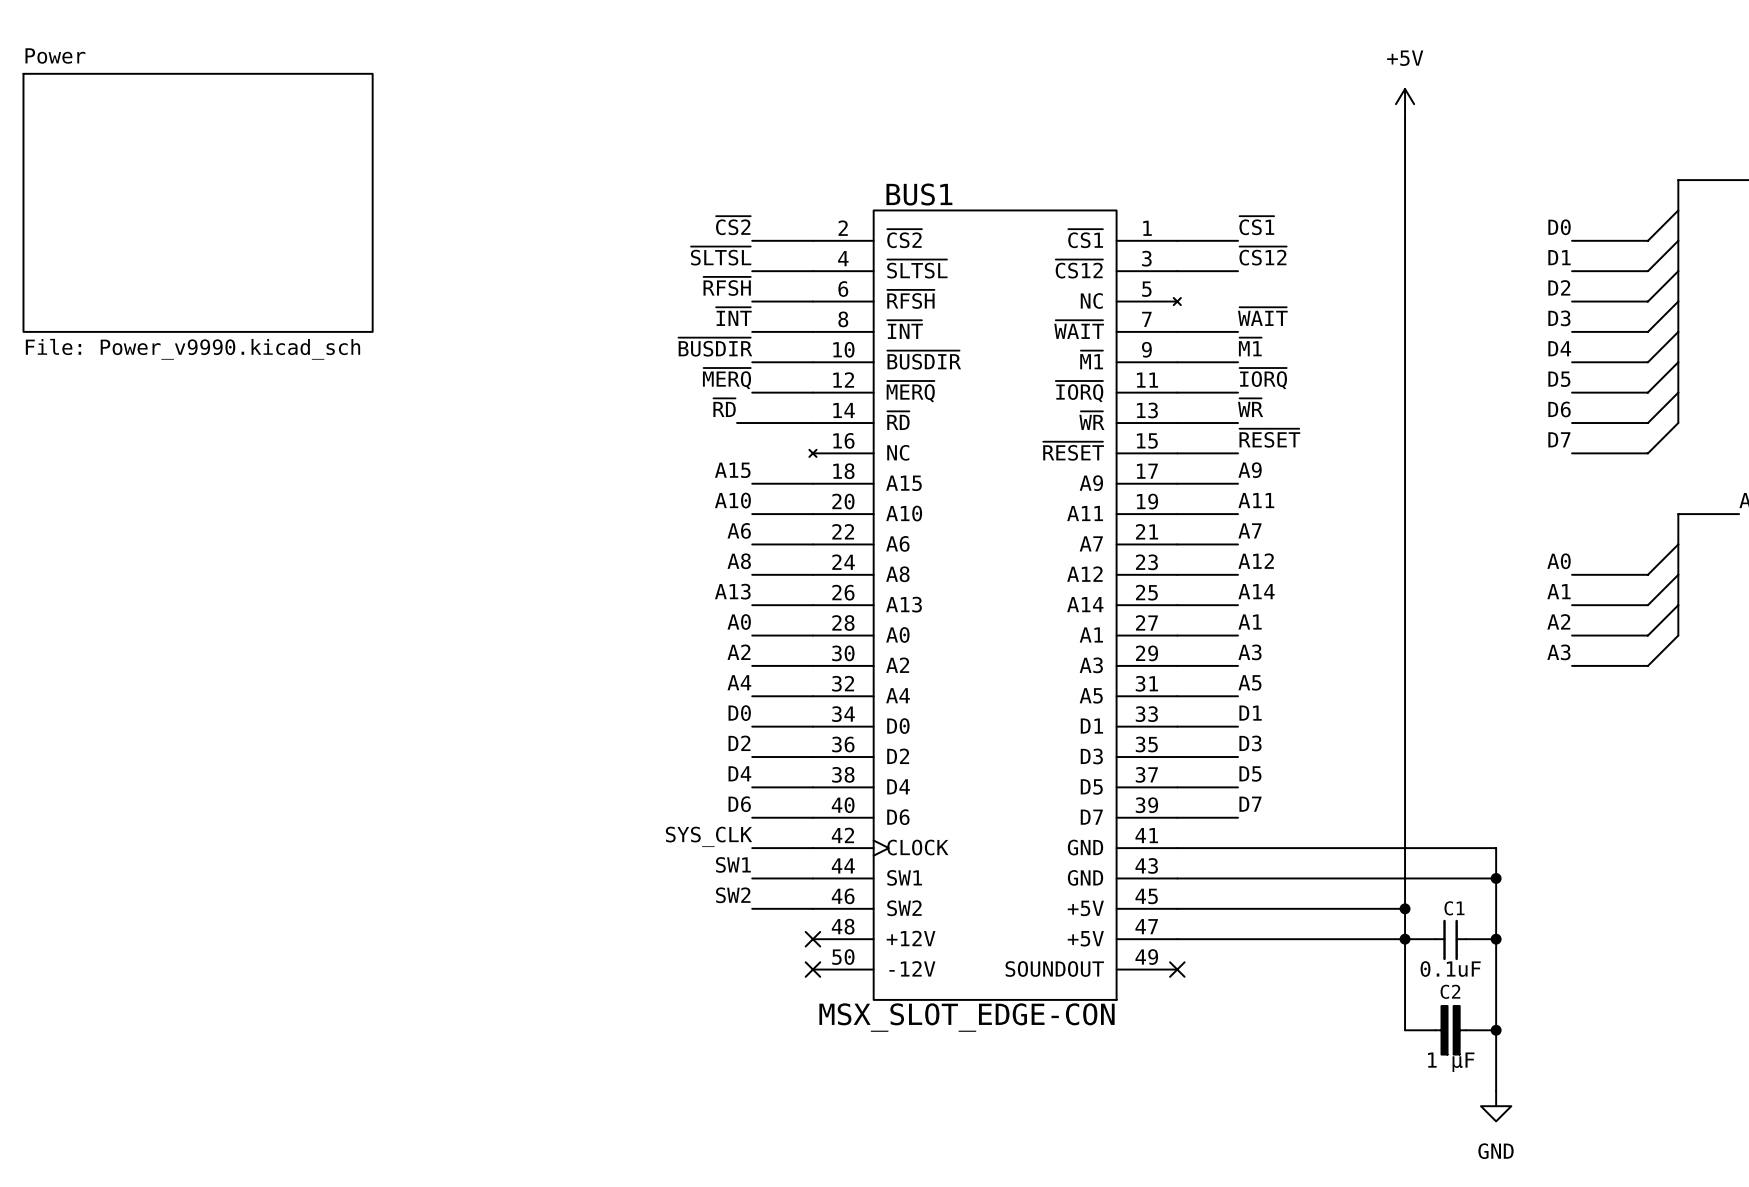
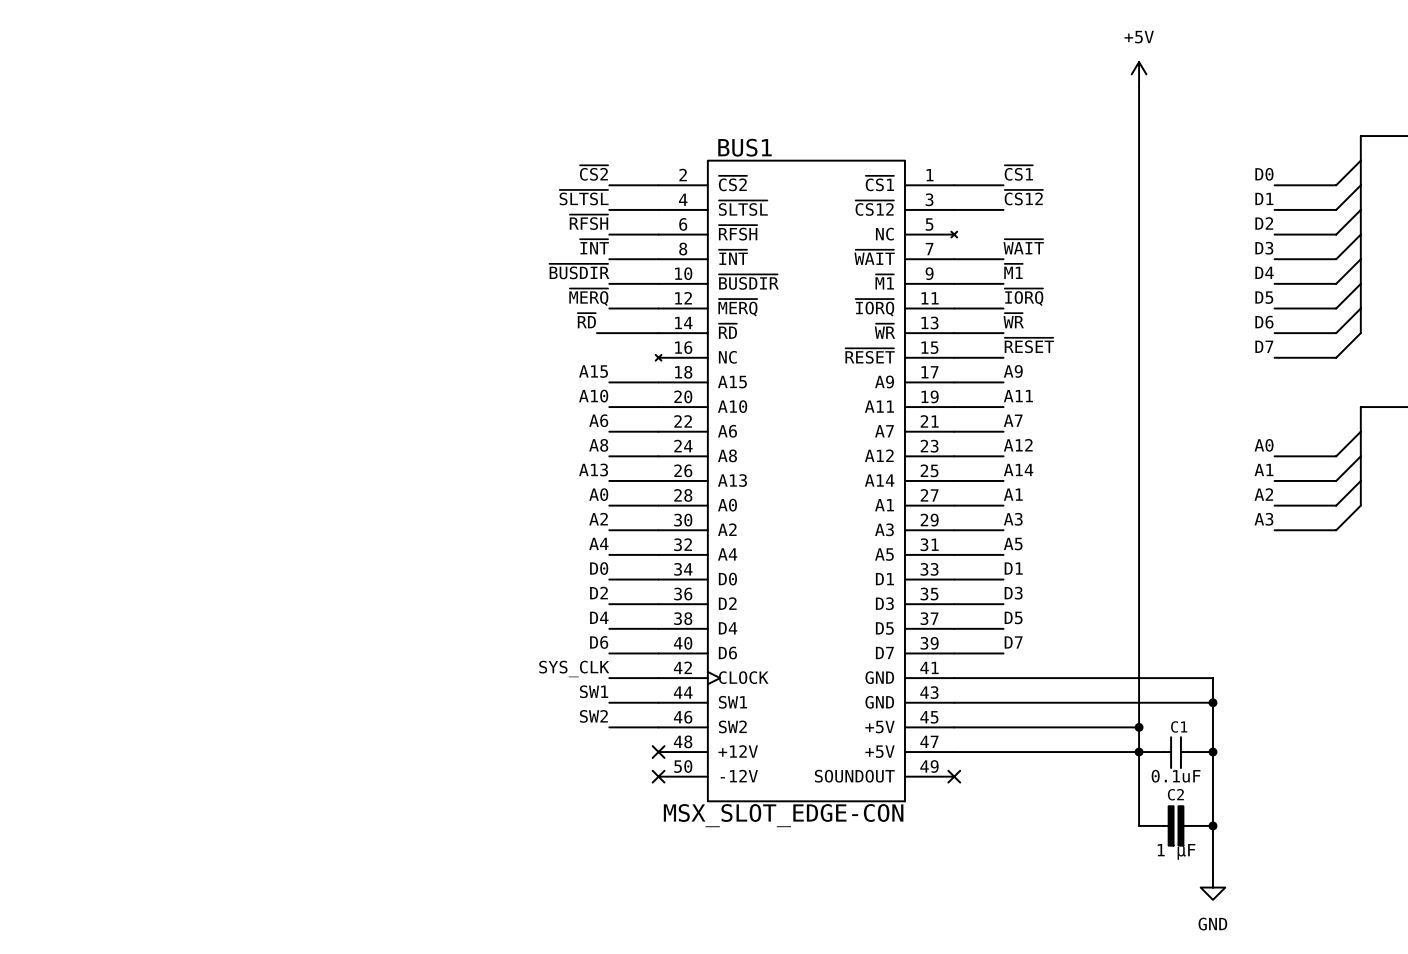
sheet Power: File: Power_v9990.kicad_sch (198, 202) -> none

